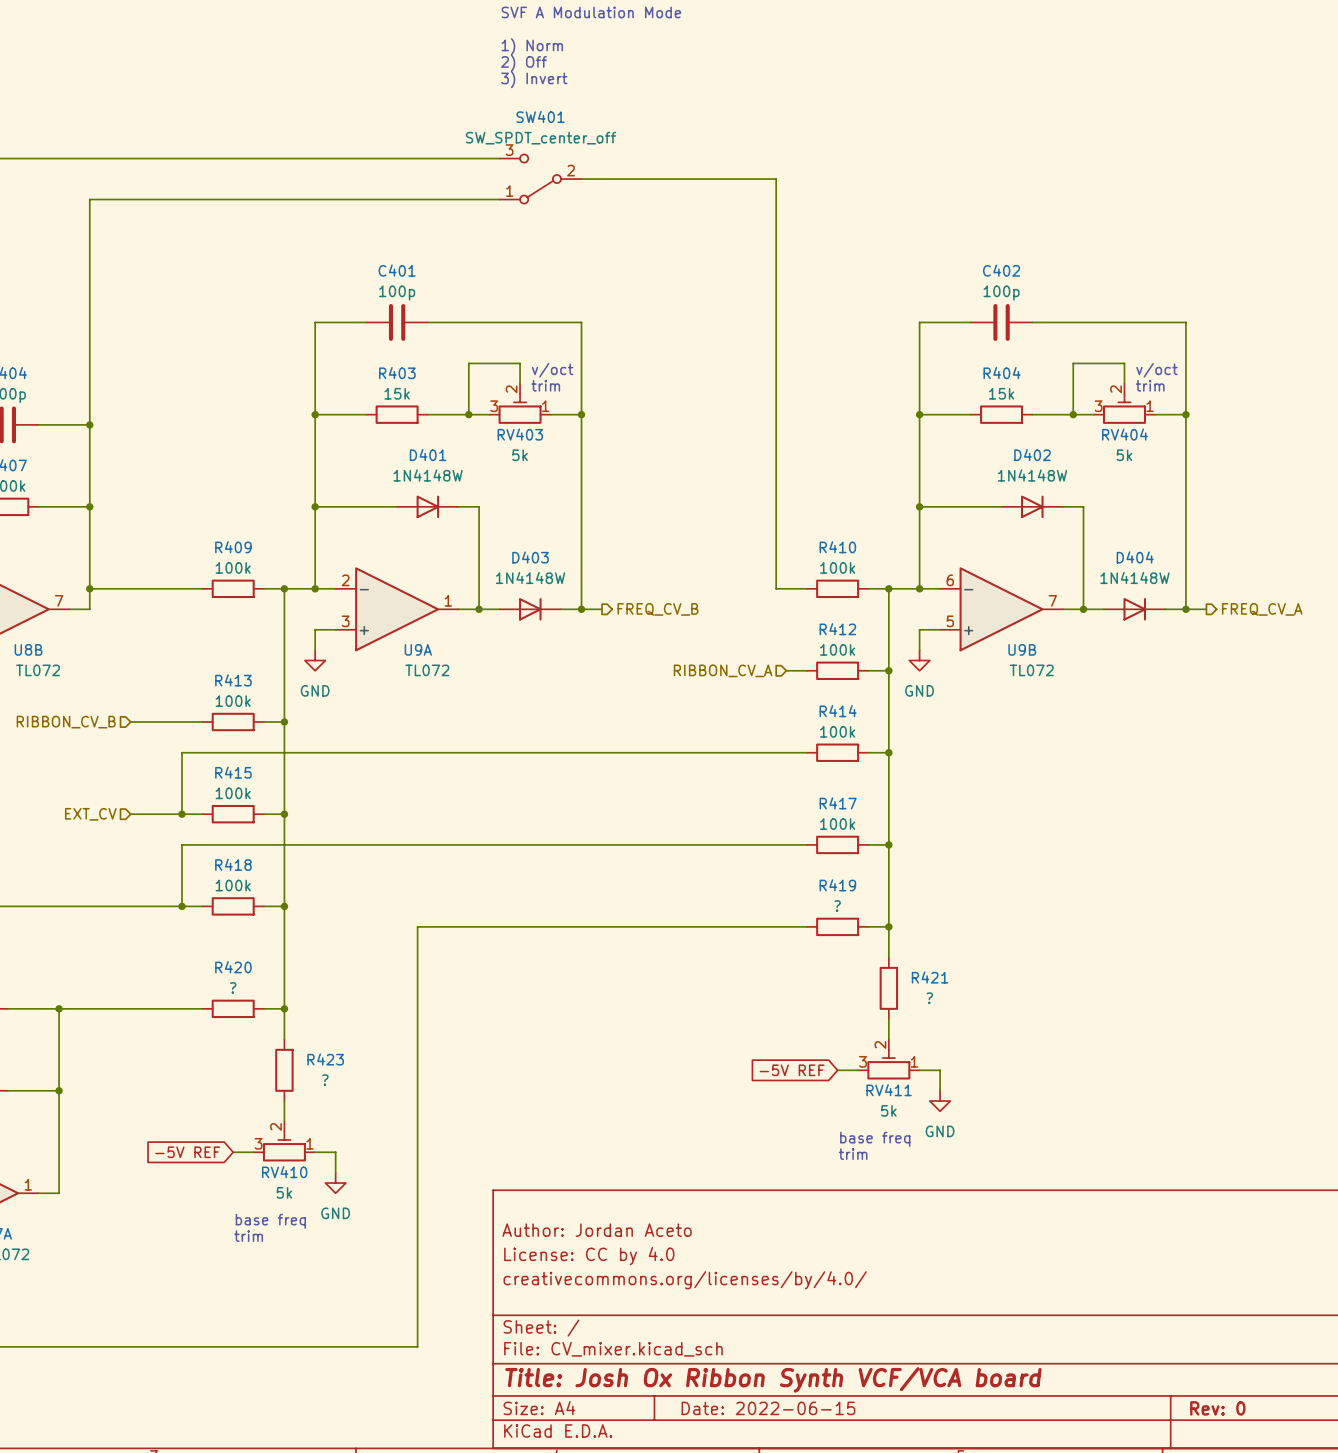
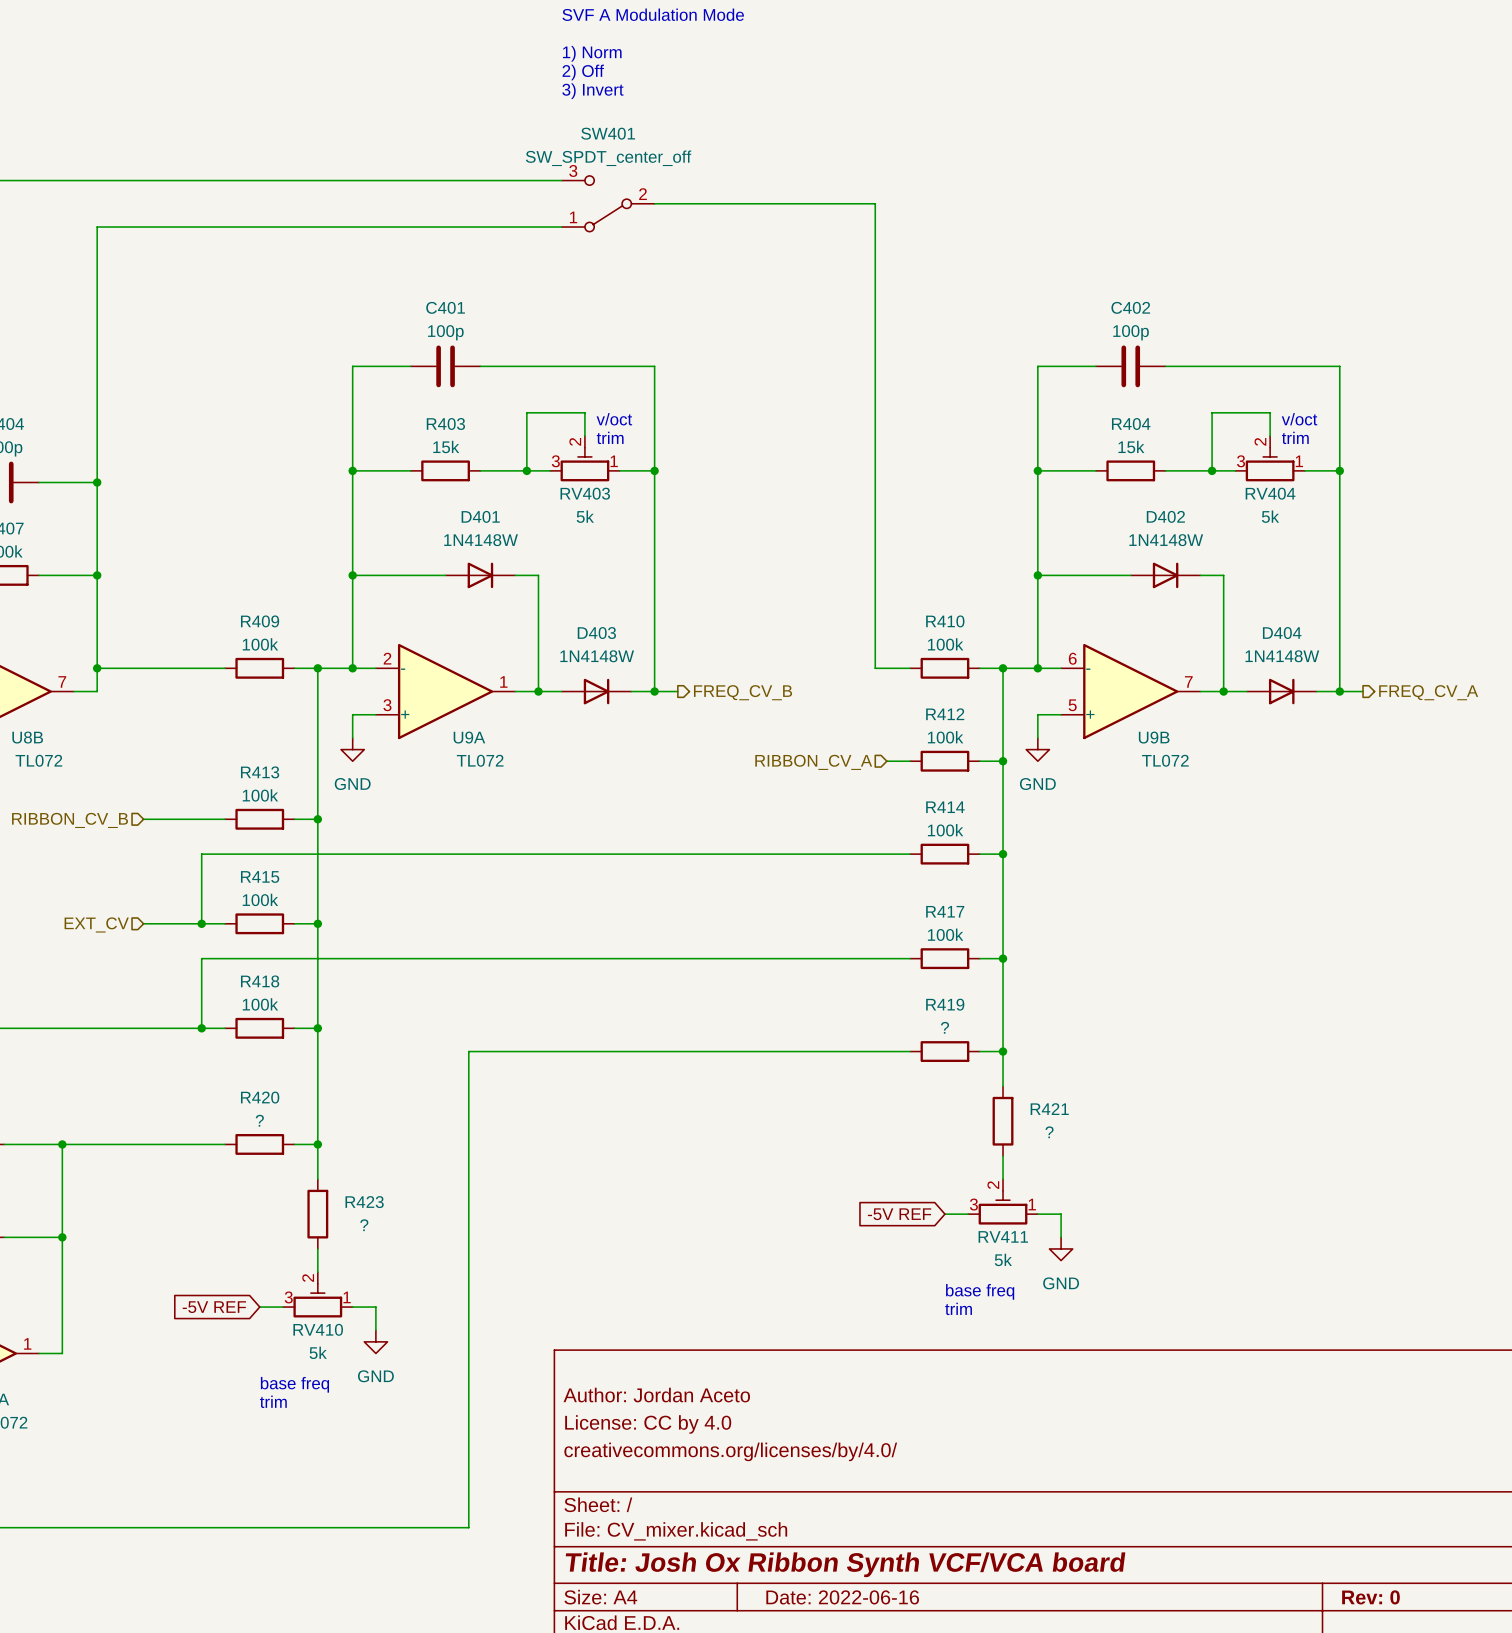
title block: Date: 2022-06-15 (768, 1408) -> Date: 2022-06-16 (842, 1597)

